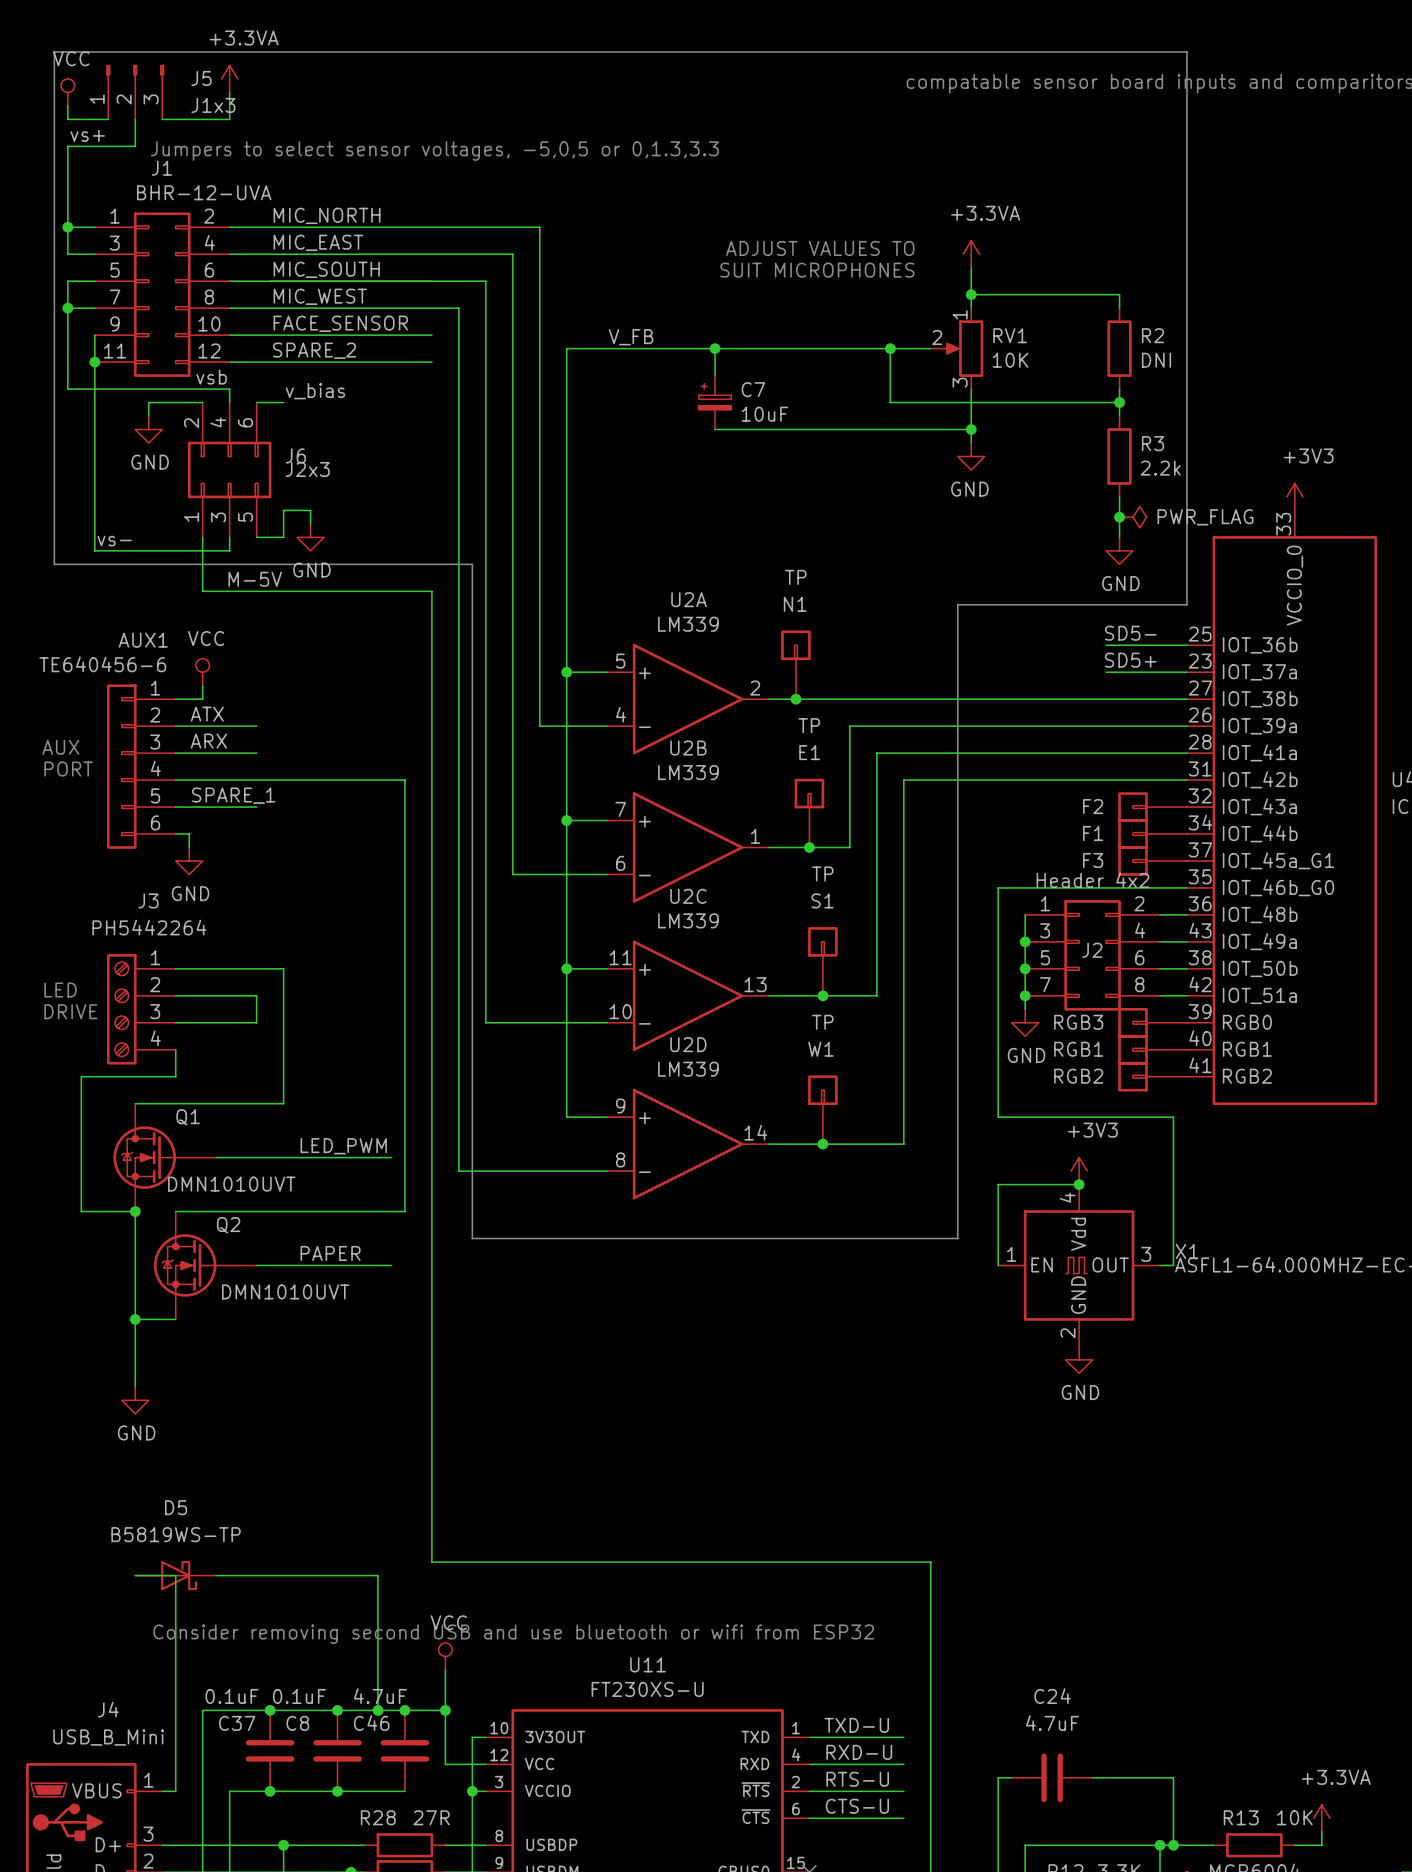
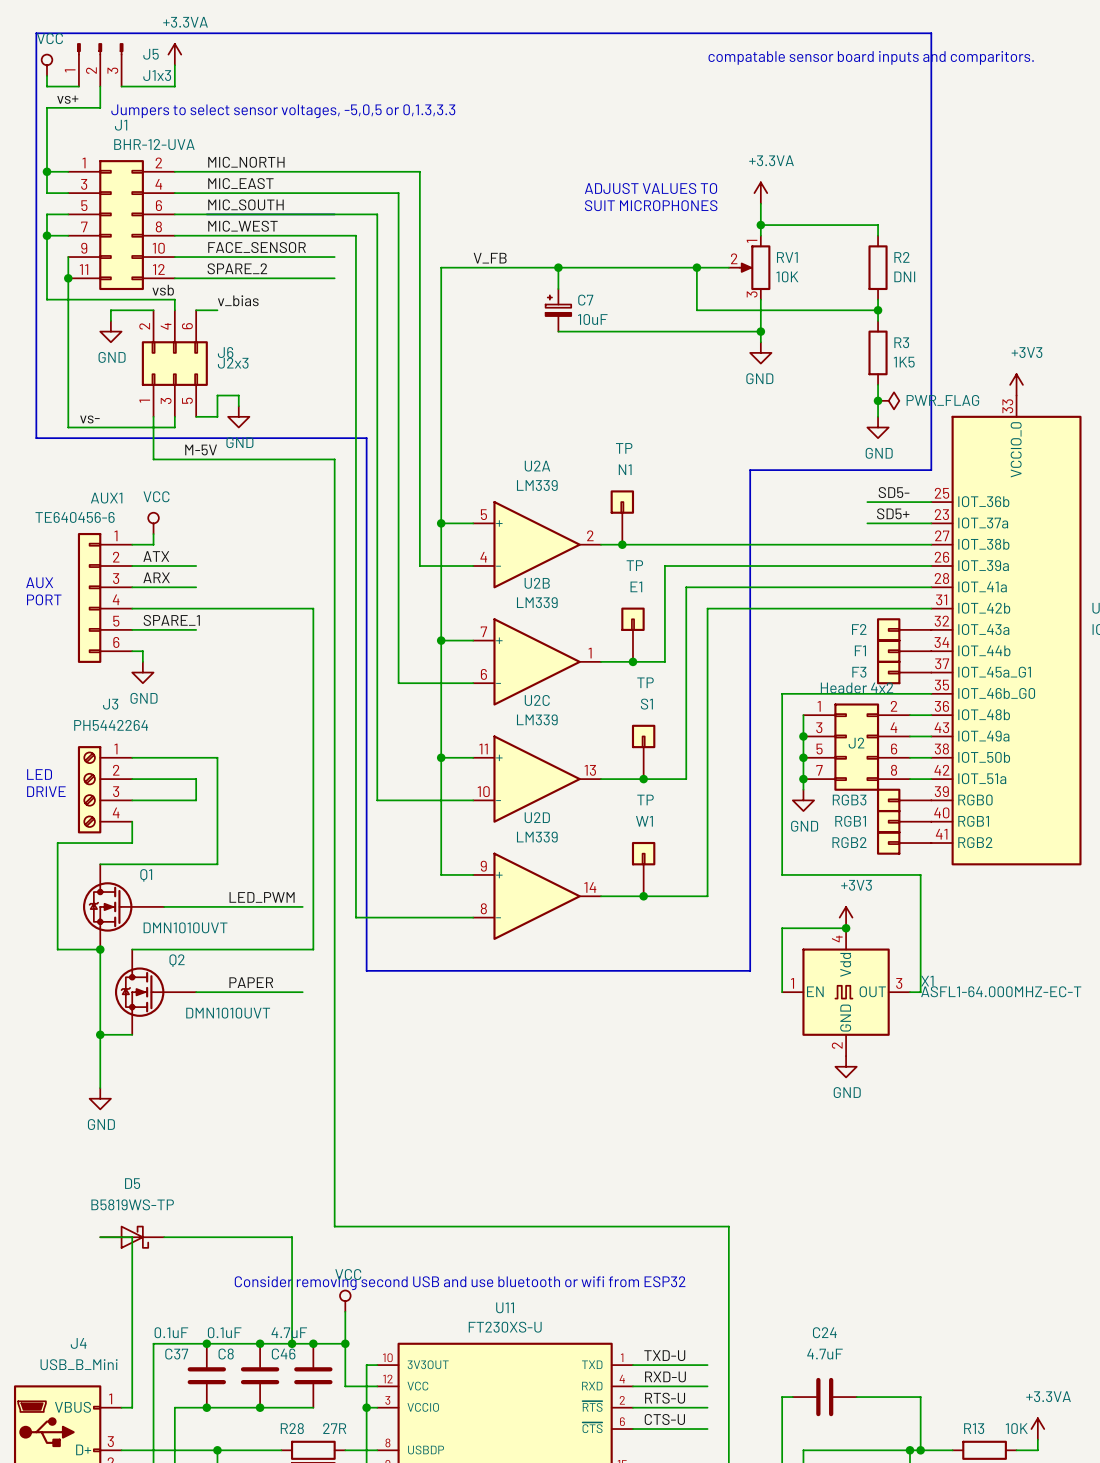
R3 value: 2.2k (1160, 468) -> 1K5 (904, 362)

